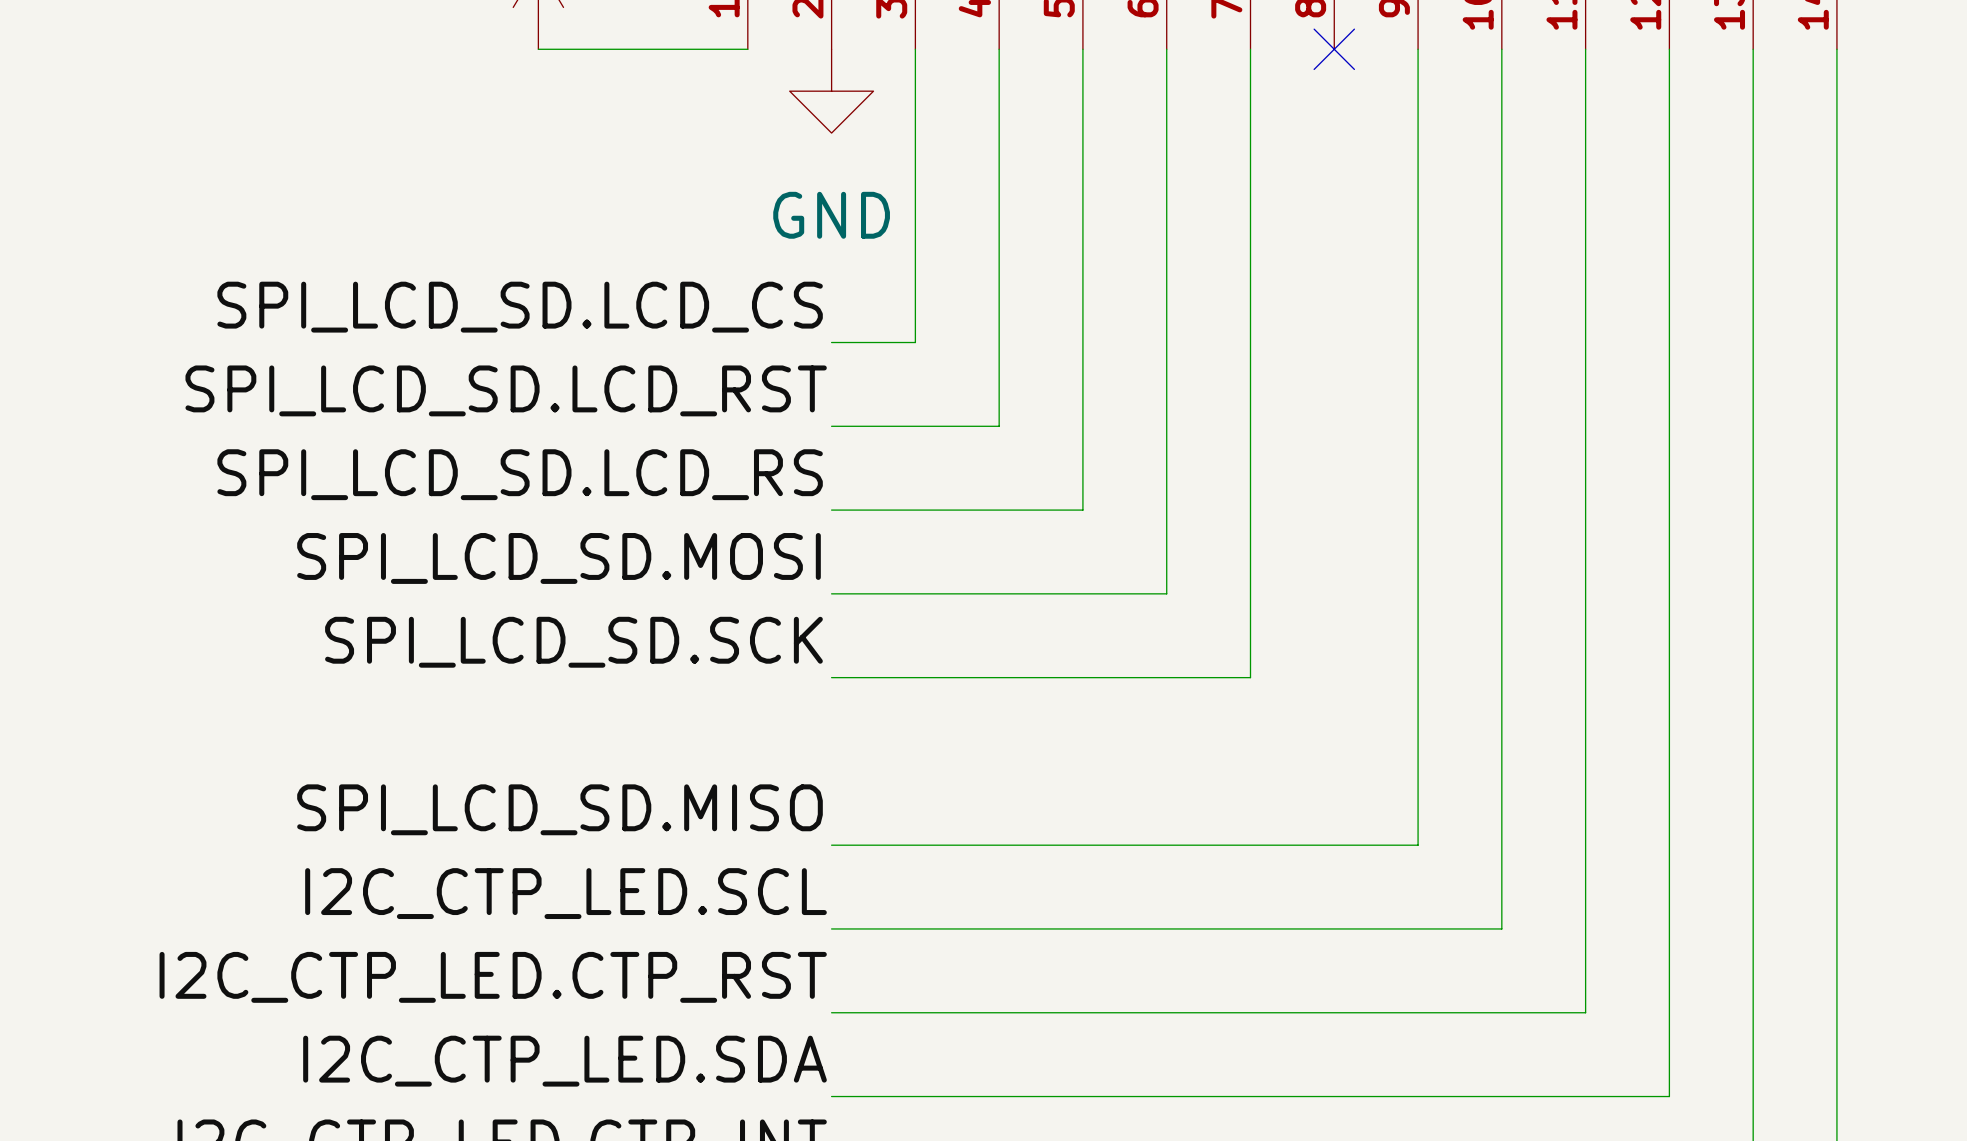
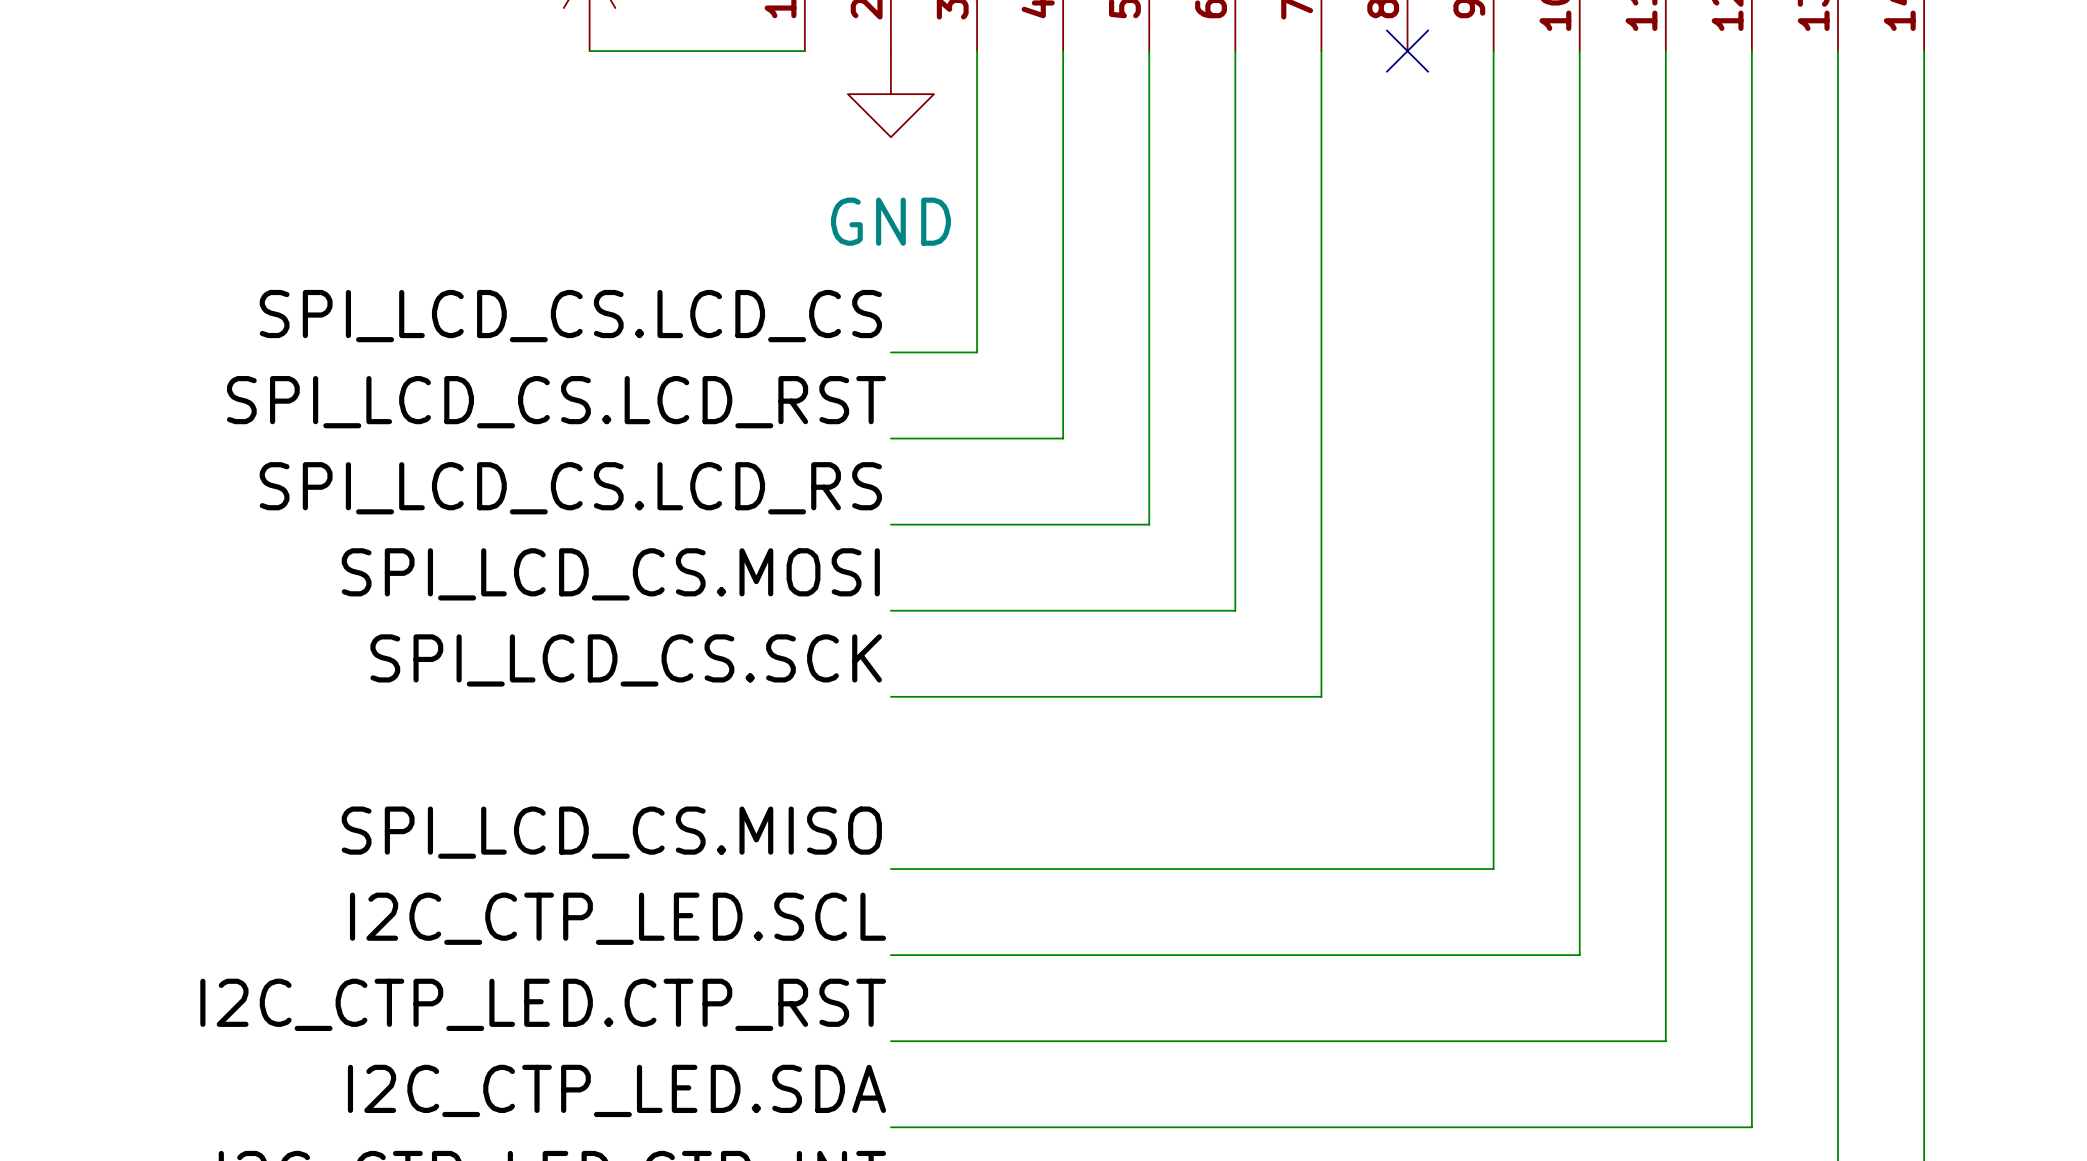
label: SPI_LCD_SD.LCD_CS (520, 307) -> SPI_LCD_CS.LCD_CS (570, 316)
label: SPI_LCD_SD.LCD_RST (506, 390) -> SPI_LCD_CS.LCD_RST (556, 402)
label: SPI_LCD_SD.LCD_RS (520, 474) -> SPI_LCD_CS.LCD_RS (570, 488)
label: SPI_LCD_SD.MOSI (559, 558) -> SPI_LCD_CS.MOSI (610, 574)
label: SPI_LCD_SD.SCK (573, 642) -> SPI_LCD_CS.SCK (626, 660)
label: SPI_LCD_SD.MISO (560, 809) -> SPI_LCD_CS.MISO (611, 832)

